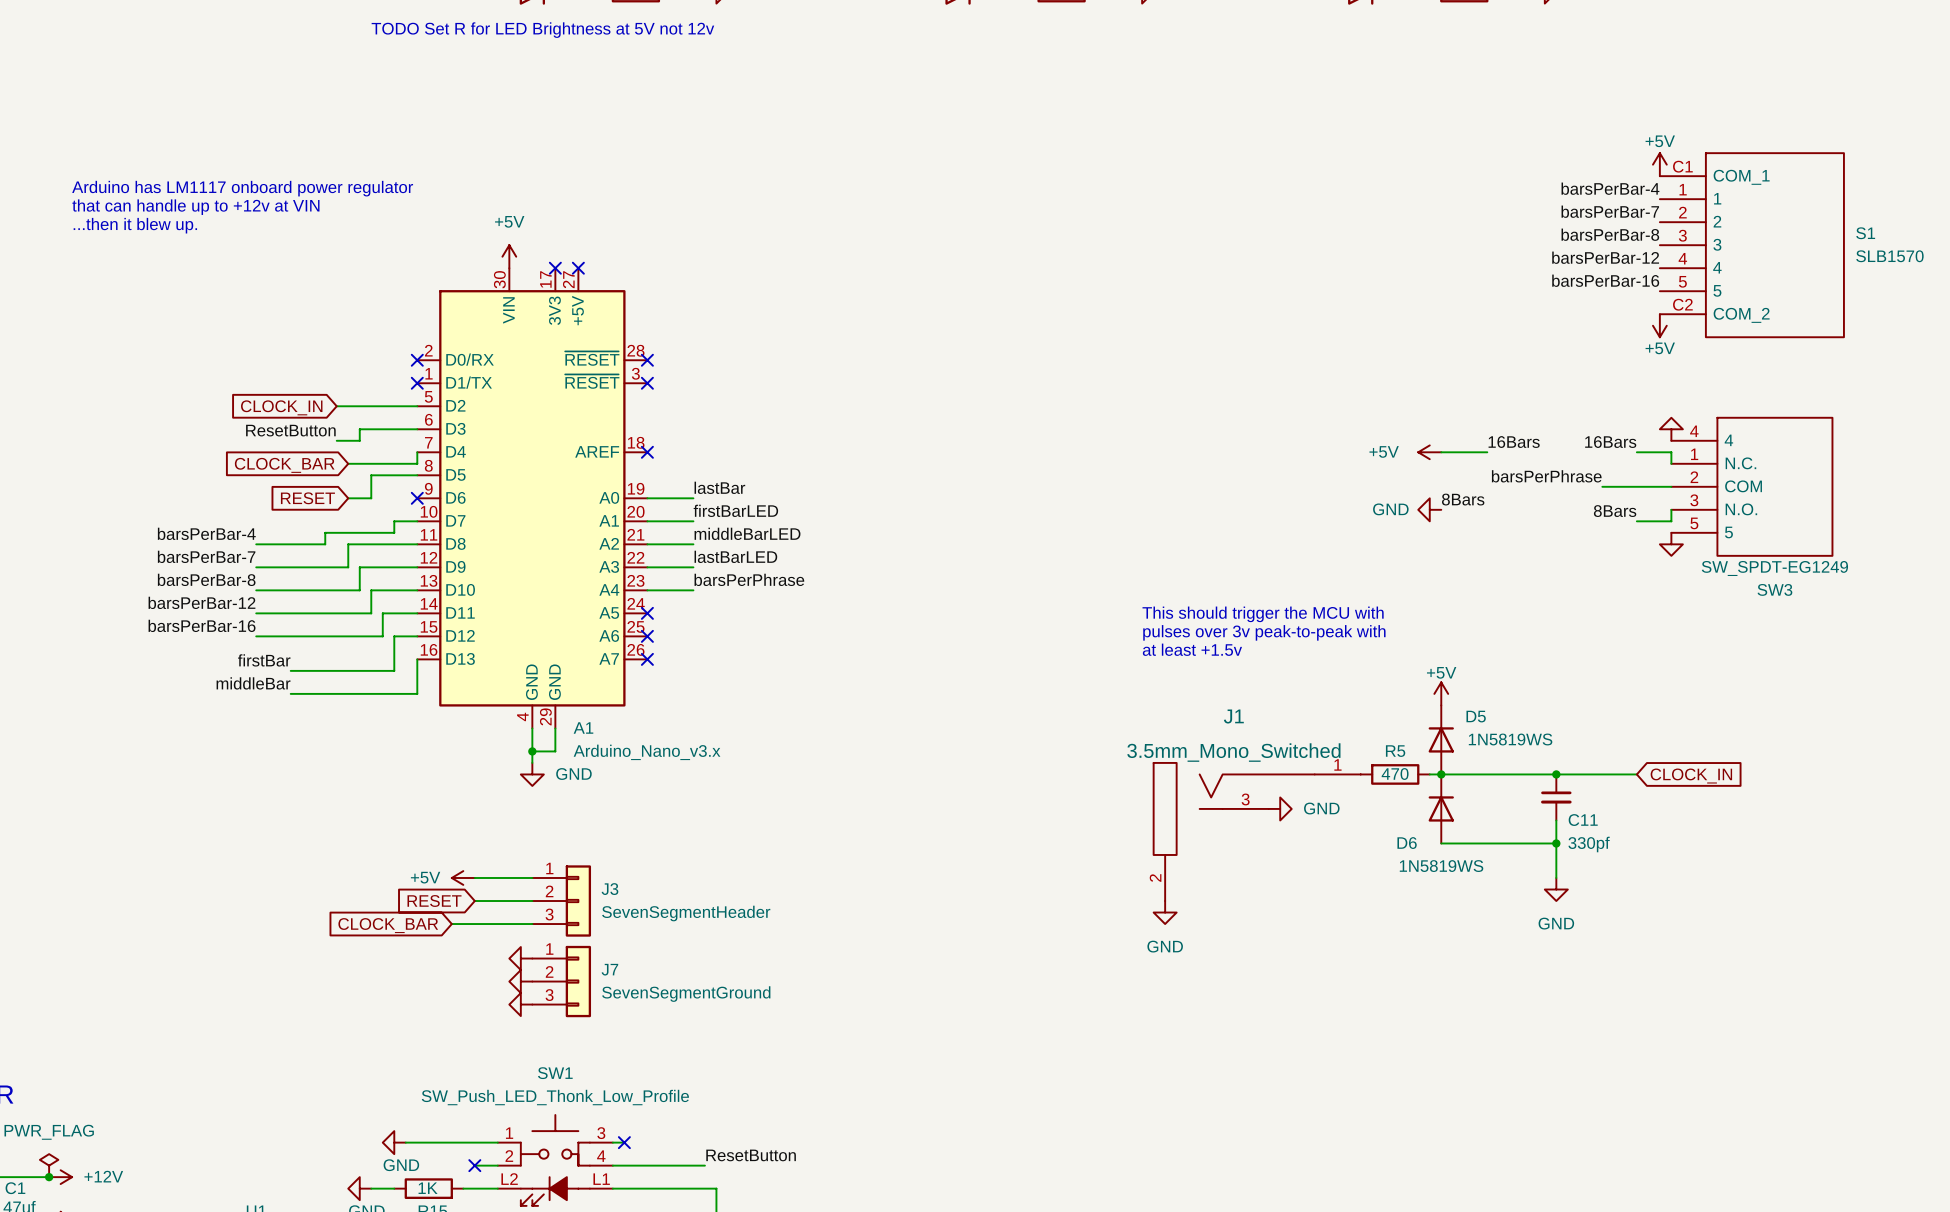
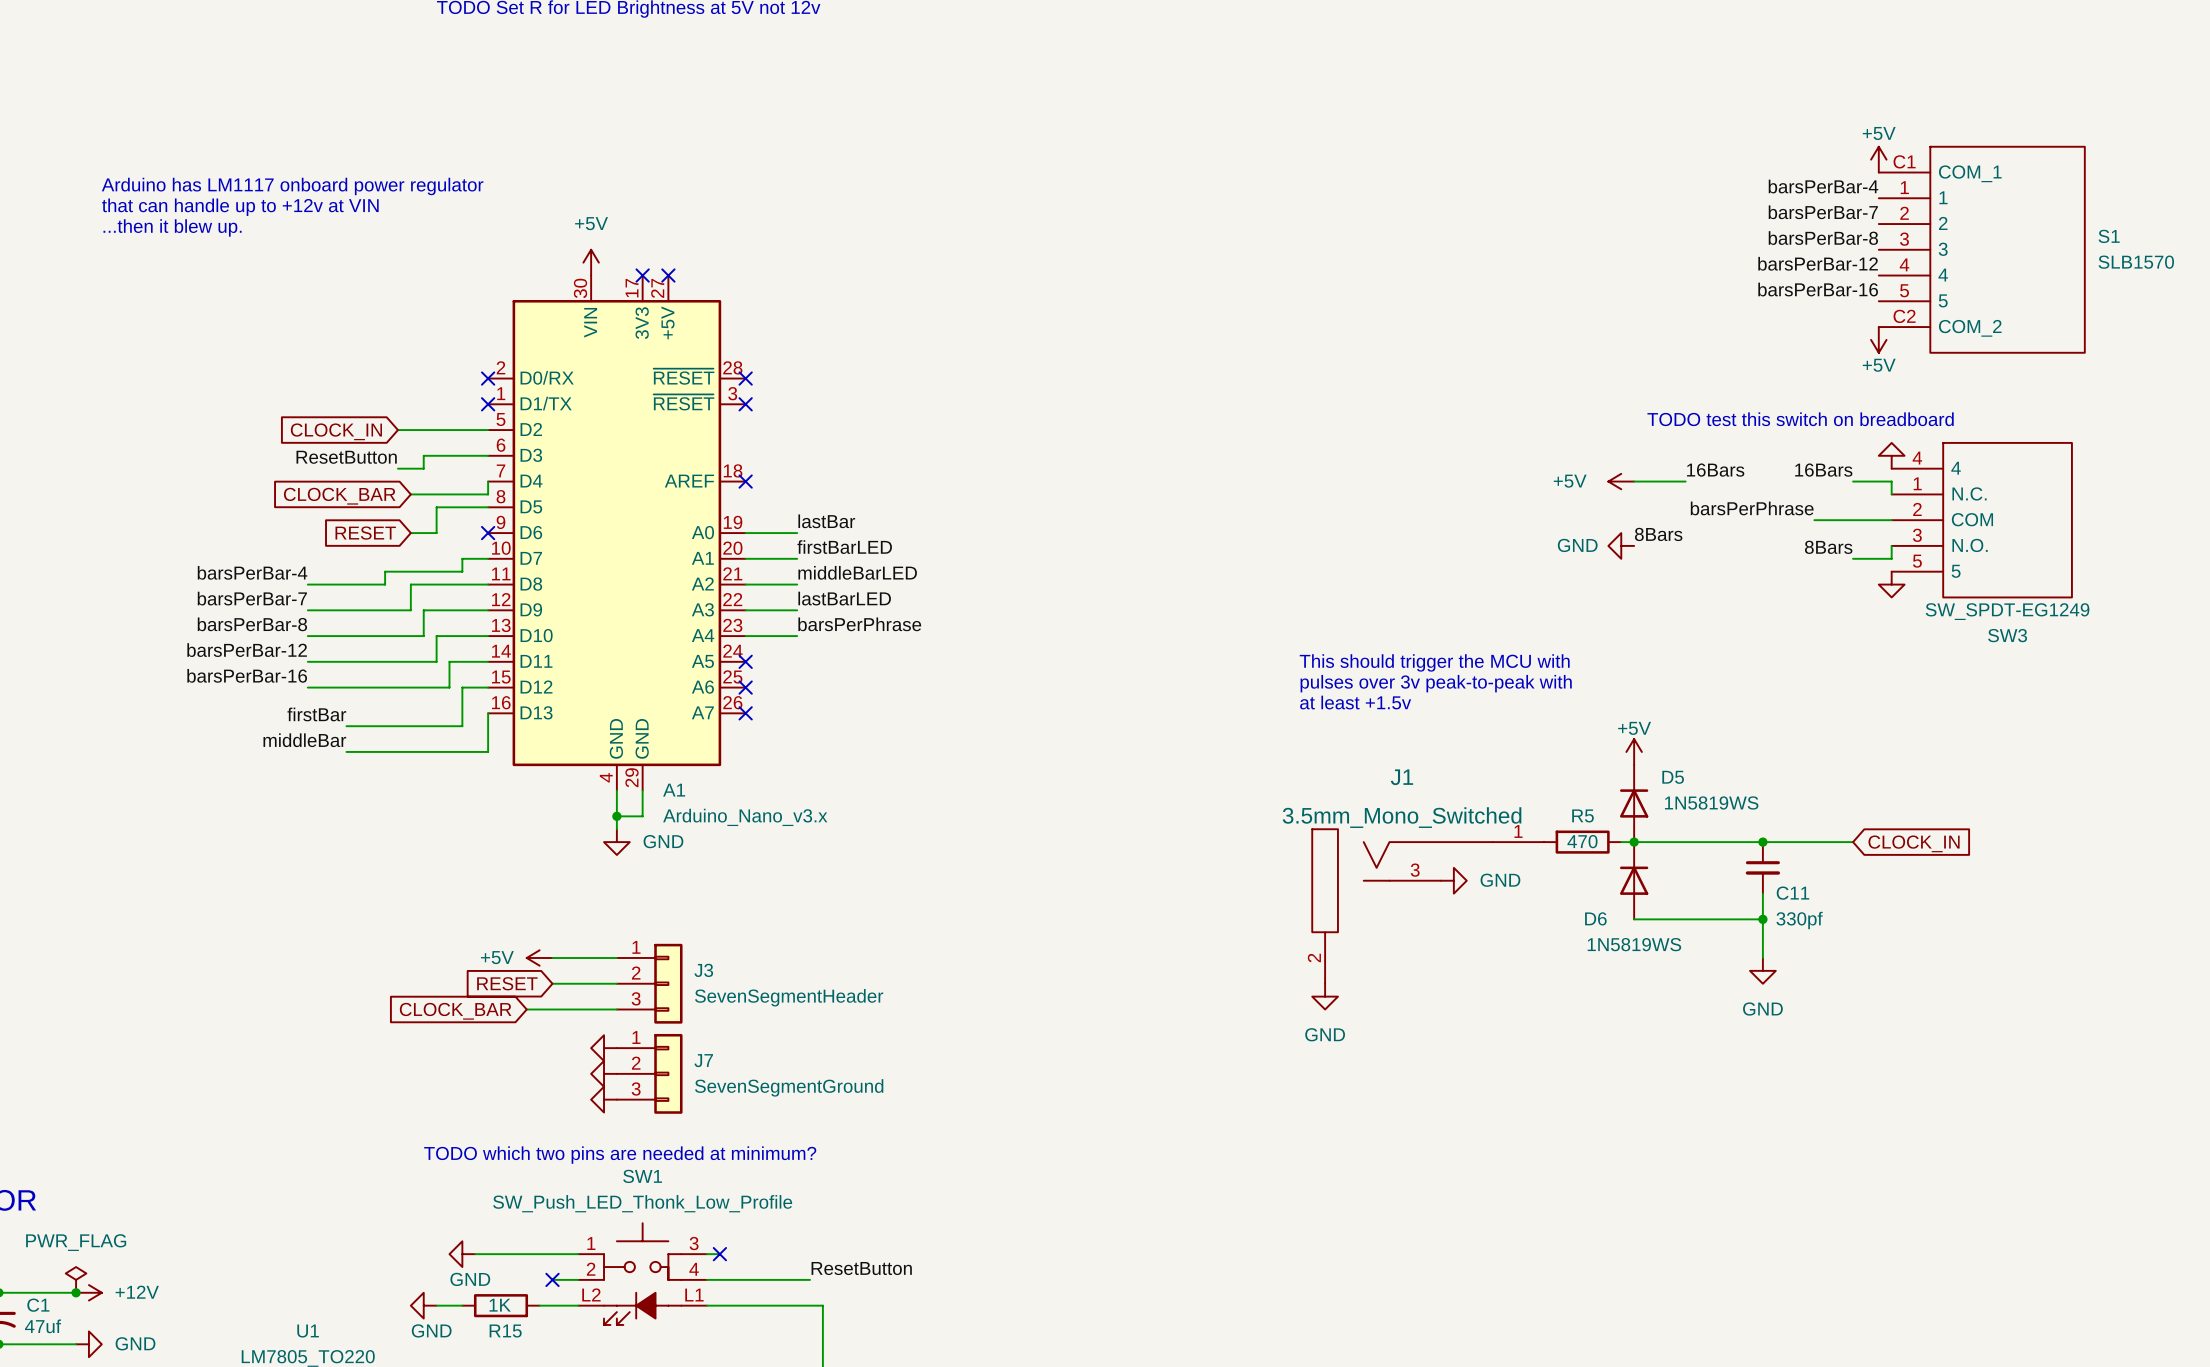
text: none -> TODO test this switch on breadboard (1800, 419)
text: none -> TODO which two pins are needed at minimum? (620, 1155)

